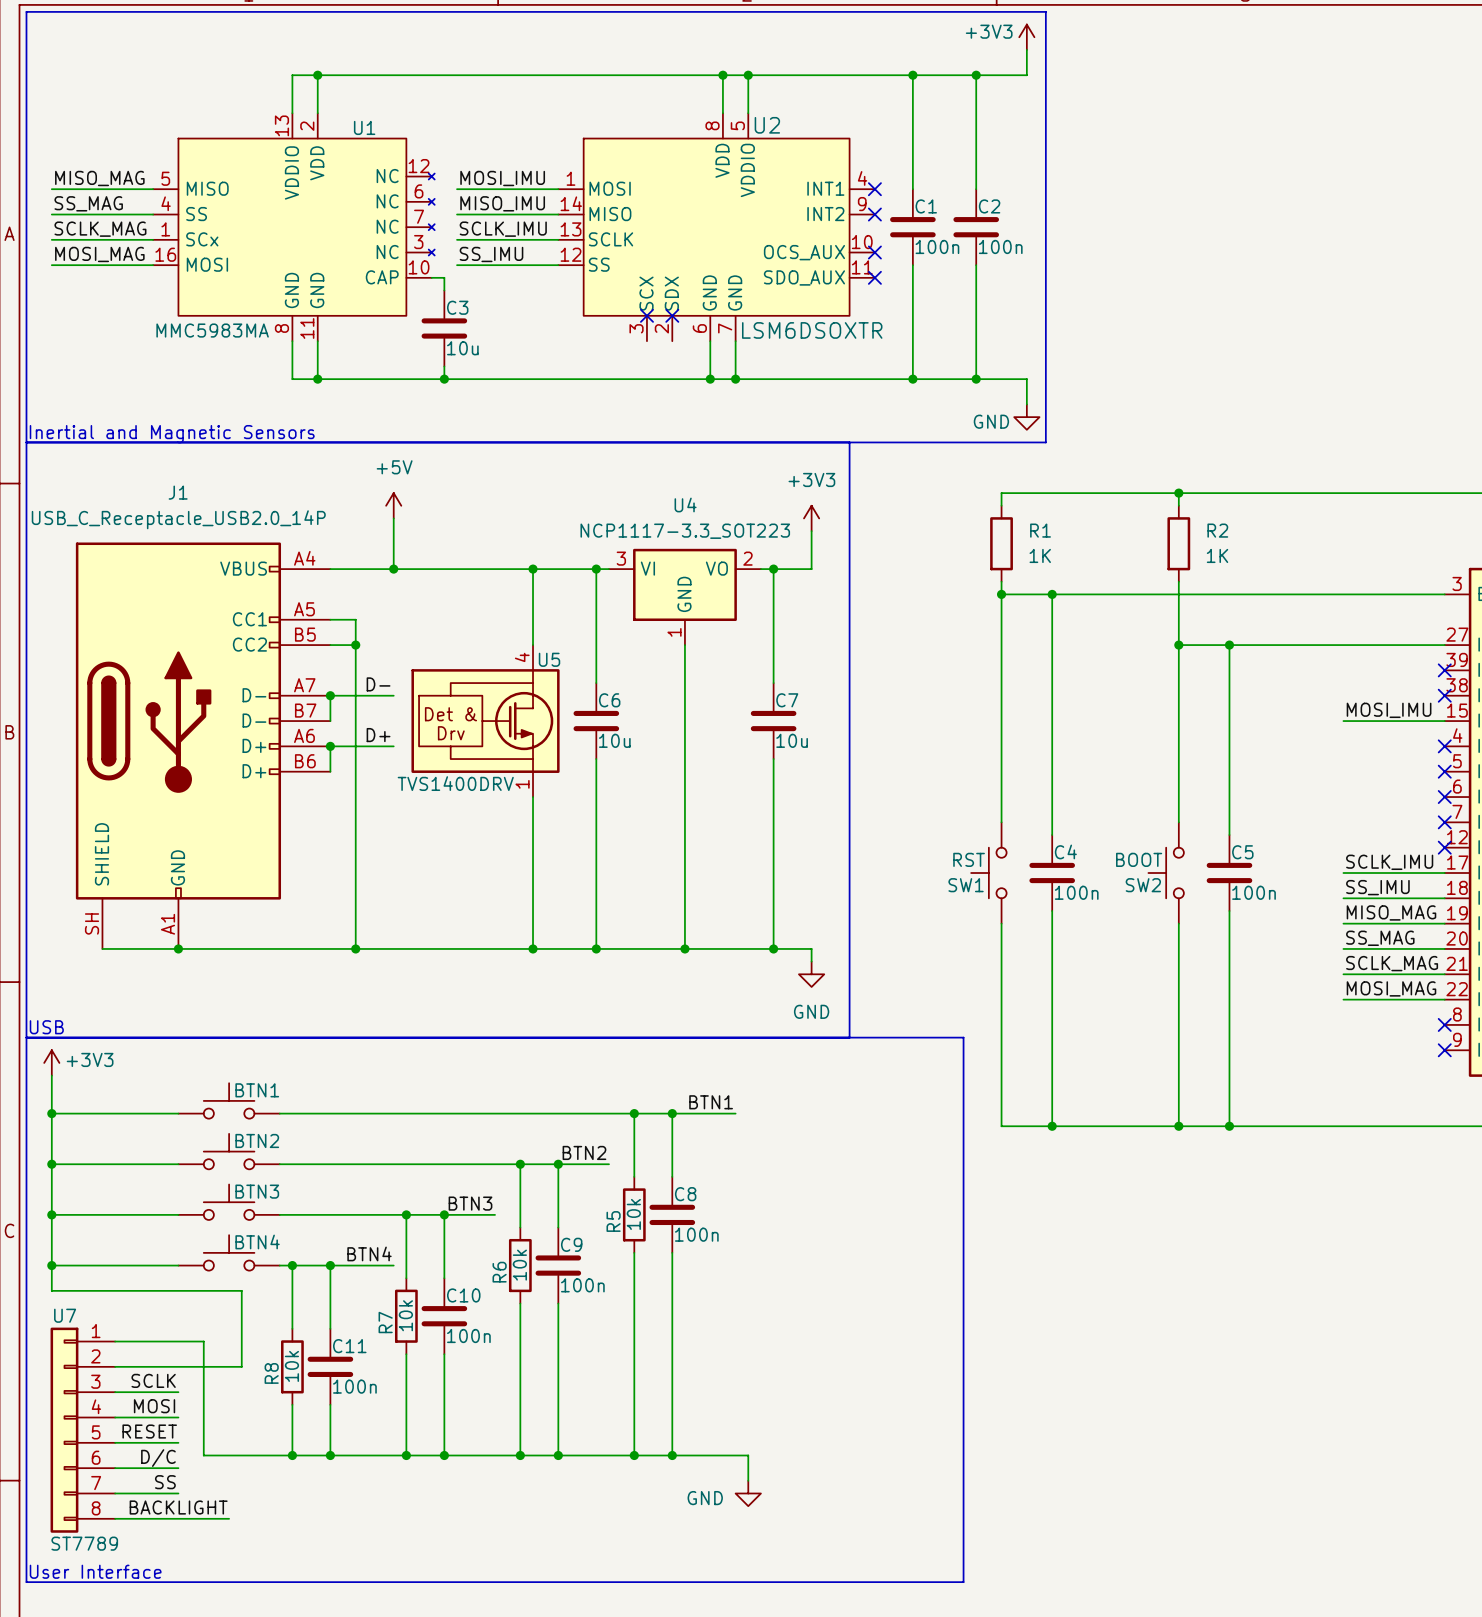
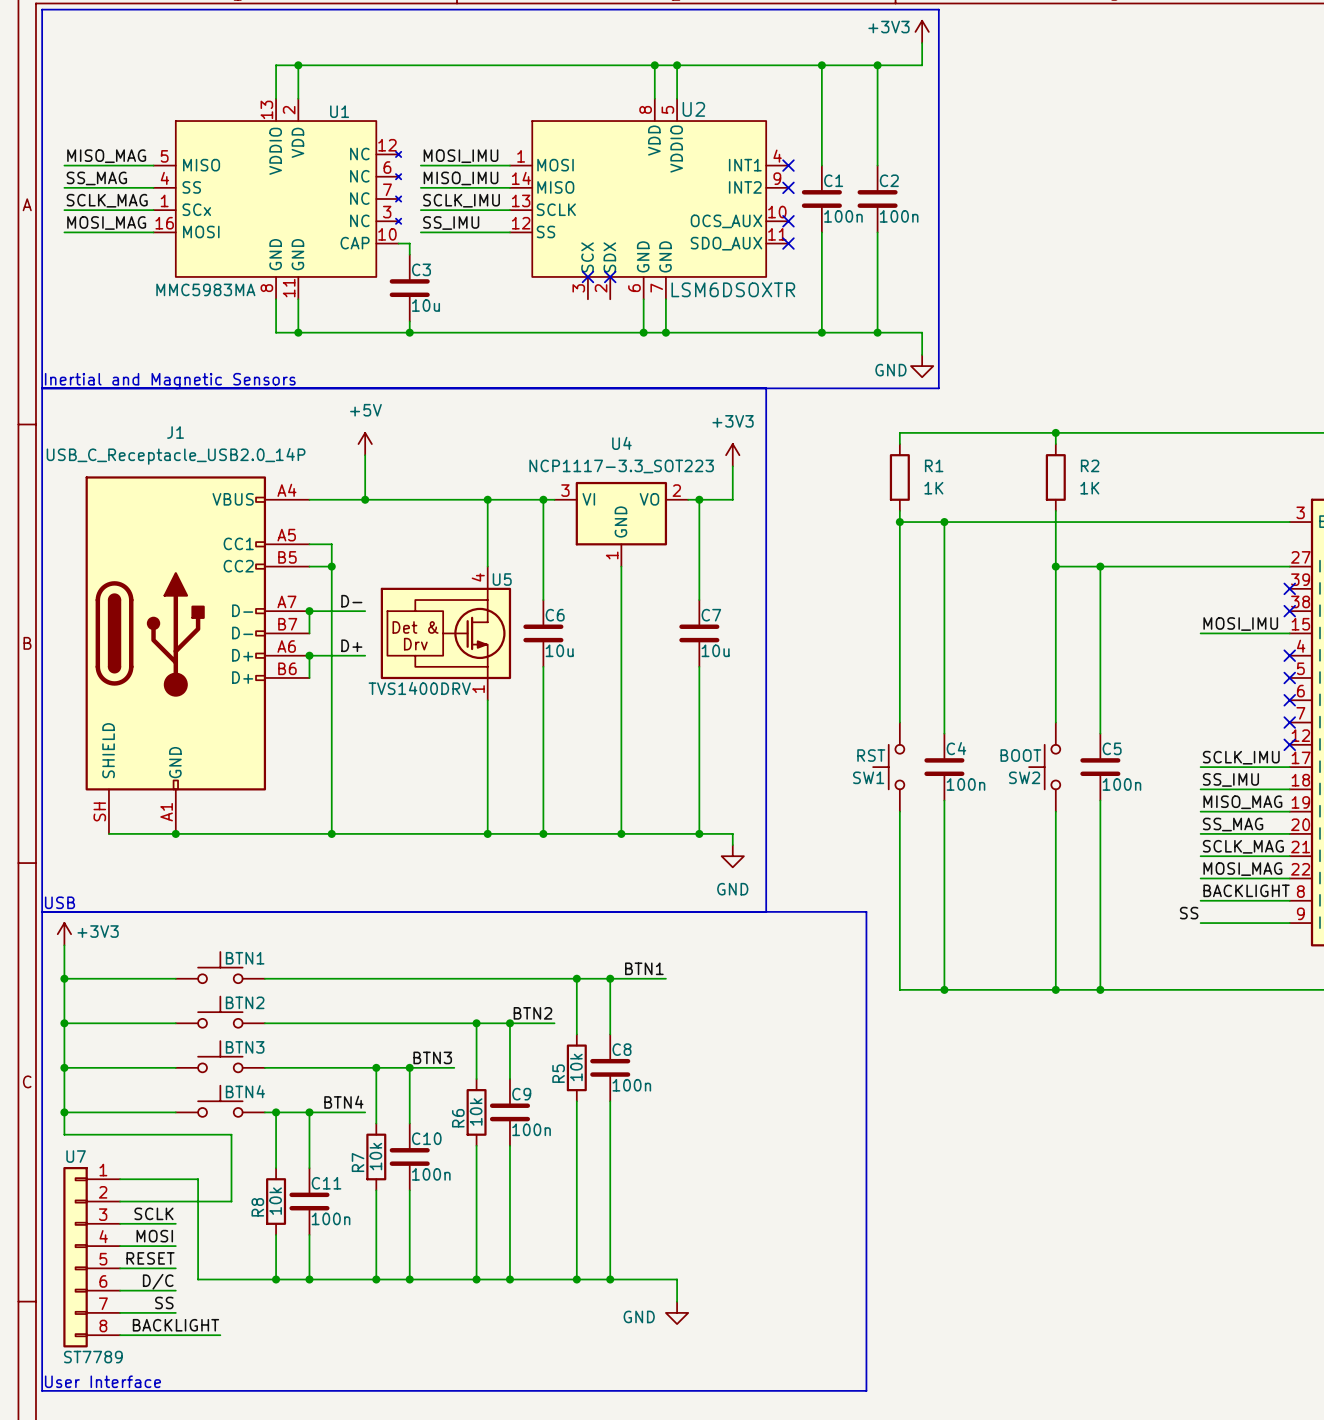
label: none -> BACKLIGHT (1246, 890)
wire: none -> (1200, 900) (1289, 900)
no-connect mark: (1444, 1024) -> none
label: none -> SS (1189, 913)
wire: none -> (1200, 923) (1289, 923)
no-connect mark: (1444, 1050) -> none

